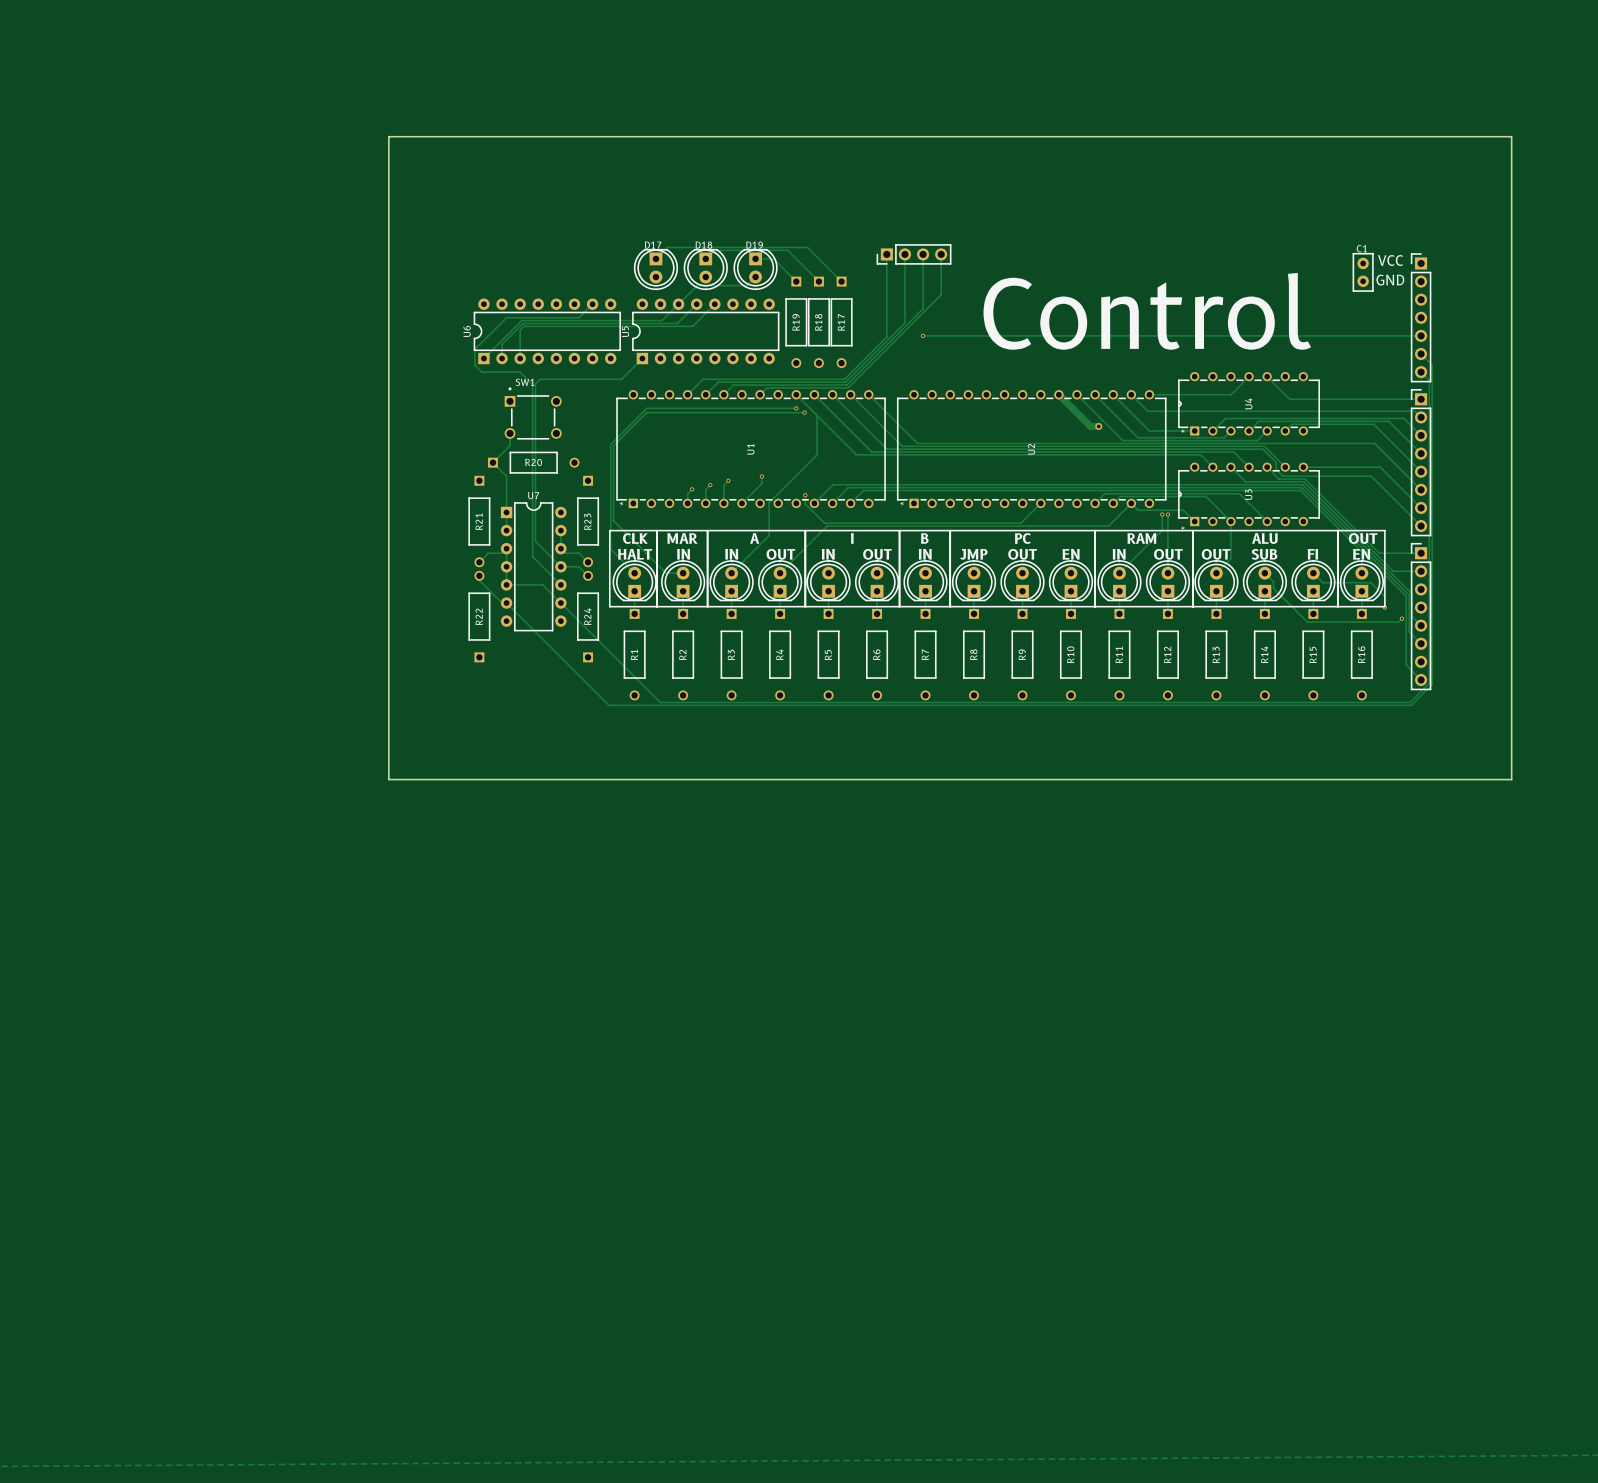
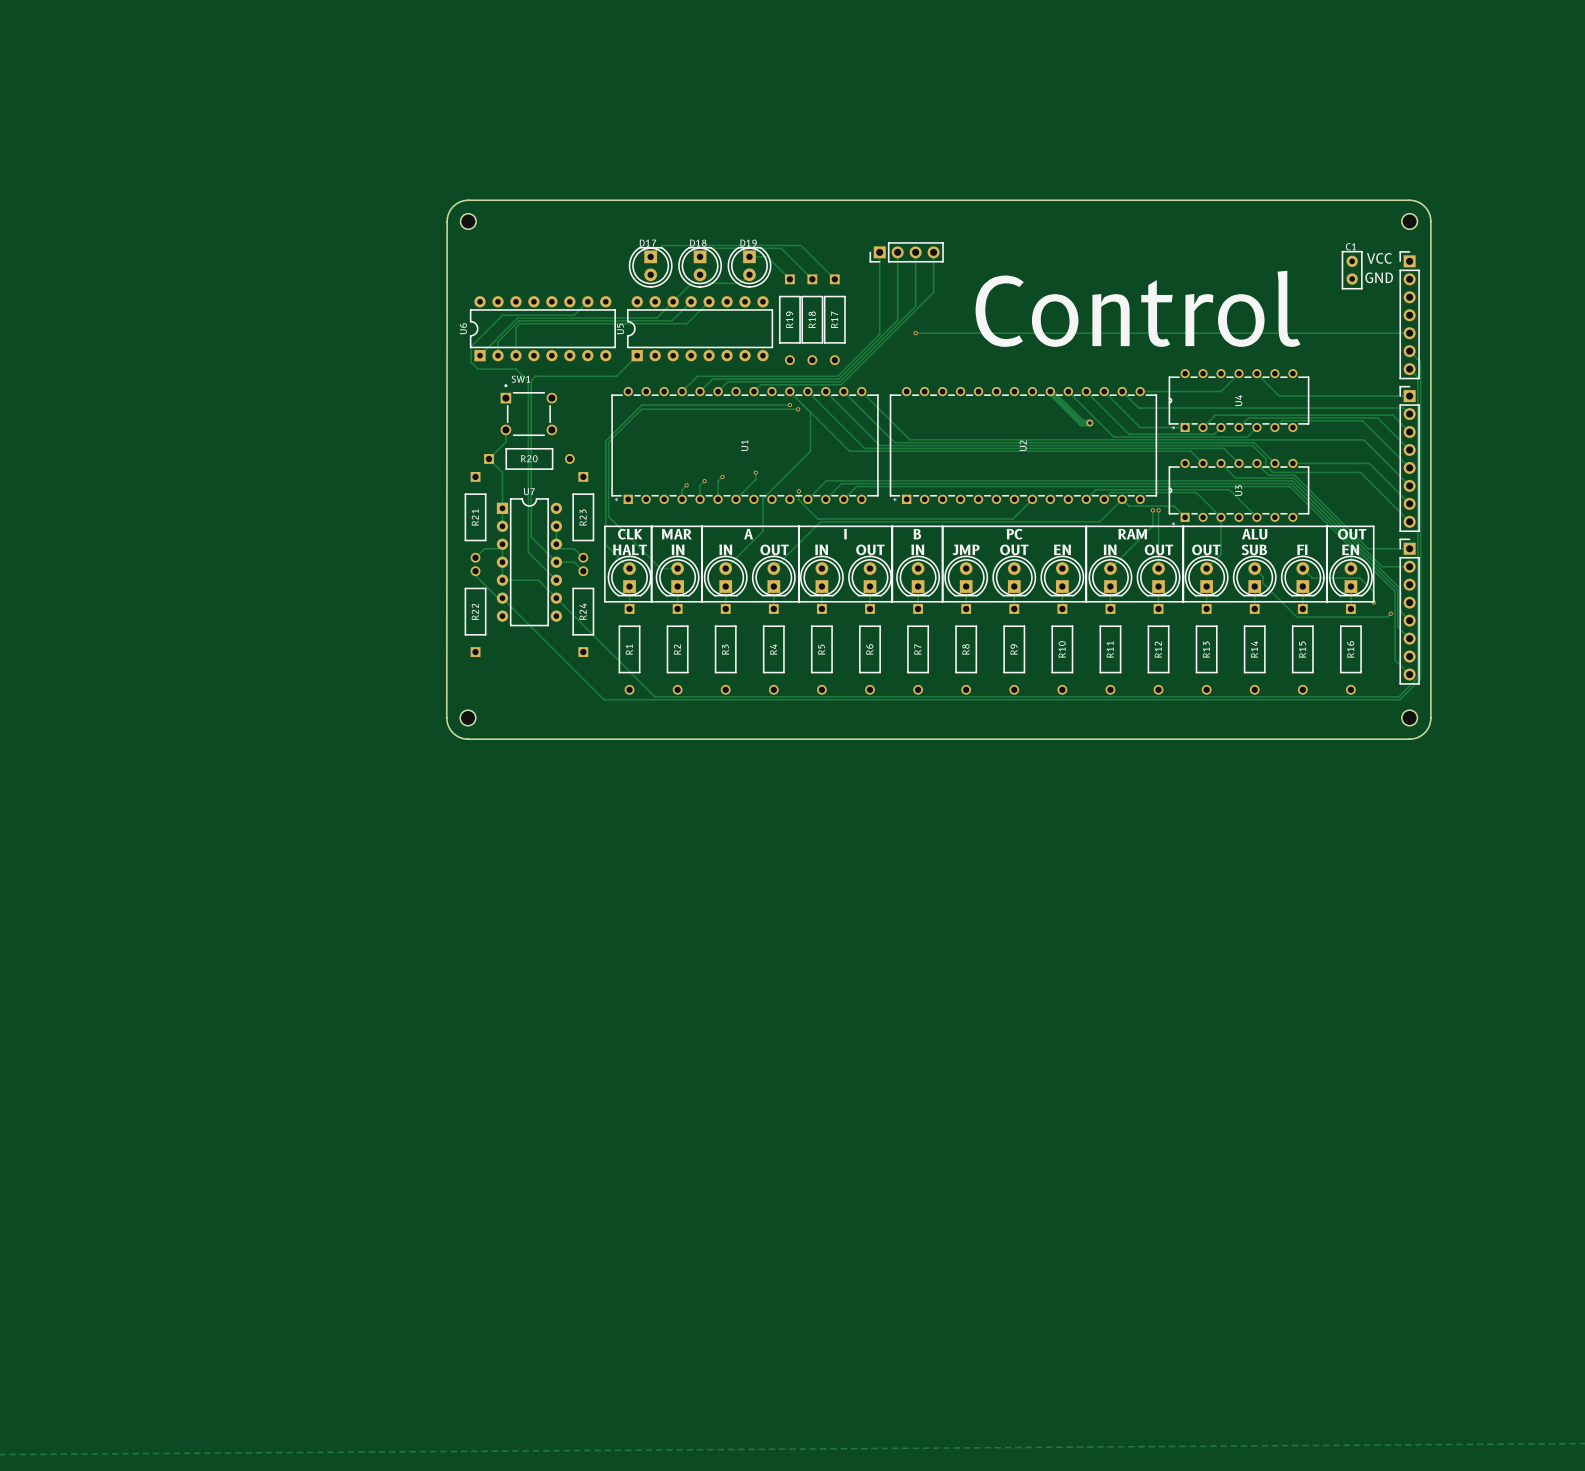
board edge: (388, 136) (1511, 136) (1511, 779) (388, 779) (388, 136) -> (468, 200) (460, 201) (453, 206) (448, 213) (447, 221) (446, 717) (449, 728) (457, 736) (468, 739) (1409, 739) (1420, 736) (1428, 728) (1430, 717) (1430, 221) (1428, 210) (1420, 203) (1409, 200) (468, 200)
part: none -> (468, 221)
part: none -> (1409, 221)
part: none -> (468, 717)
part: none -> (1409, 717)

